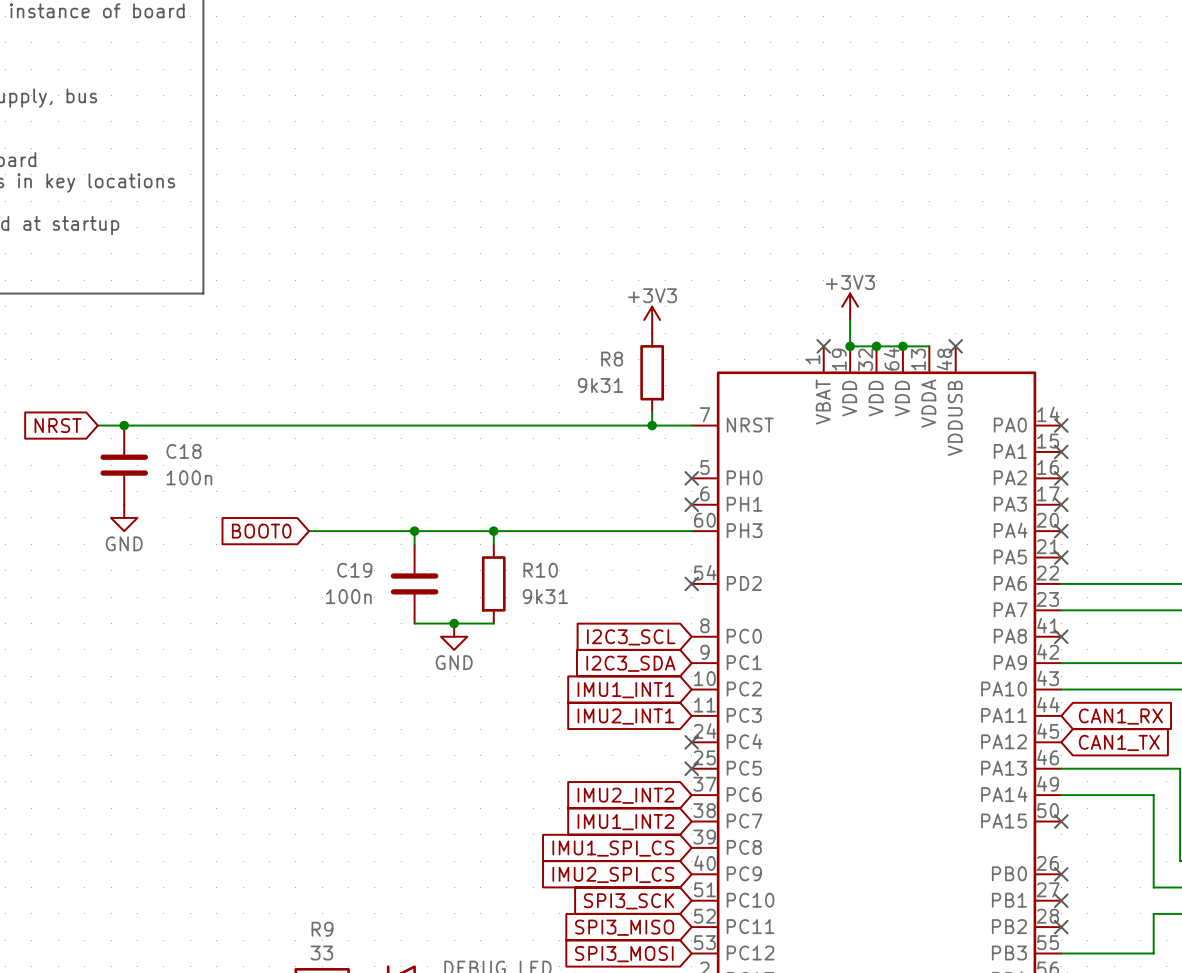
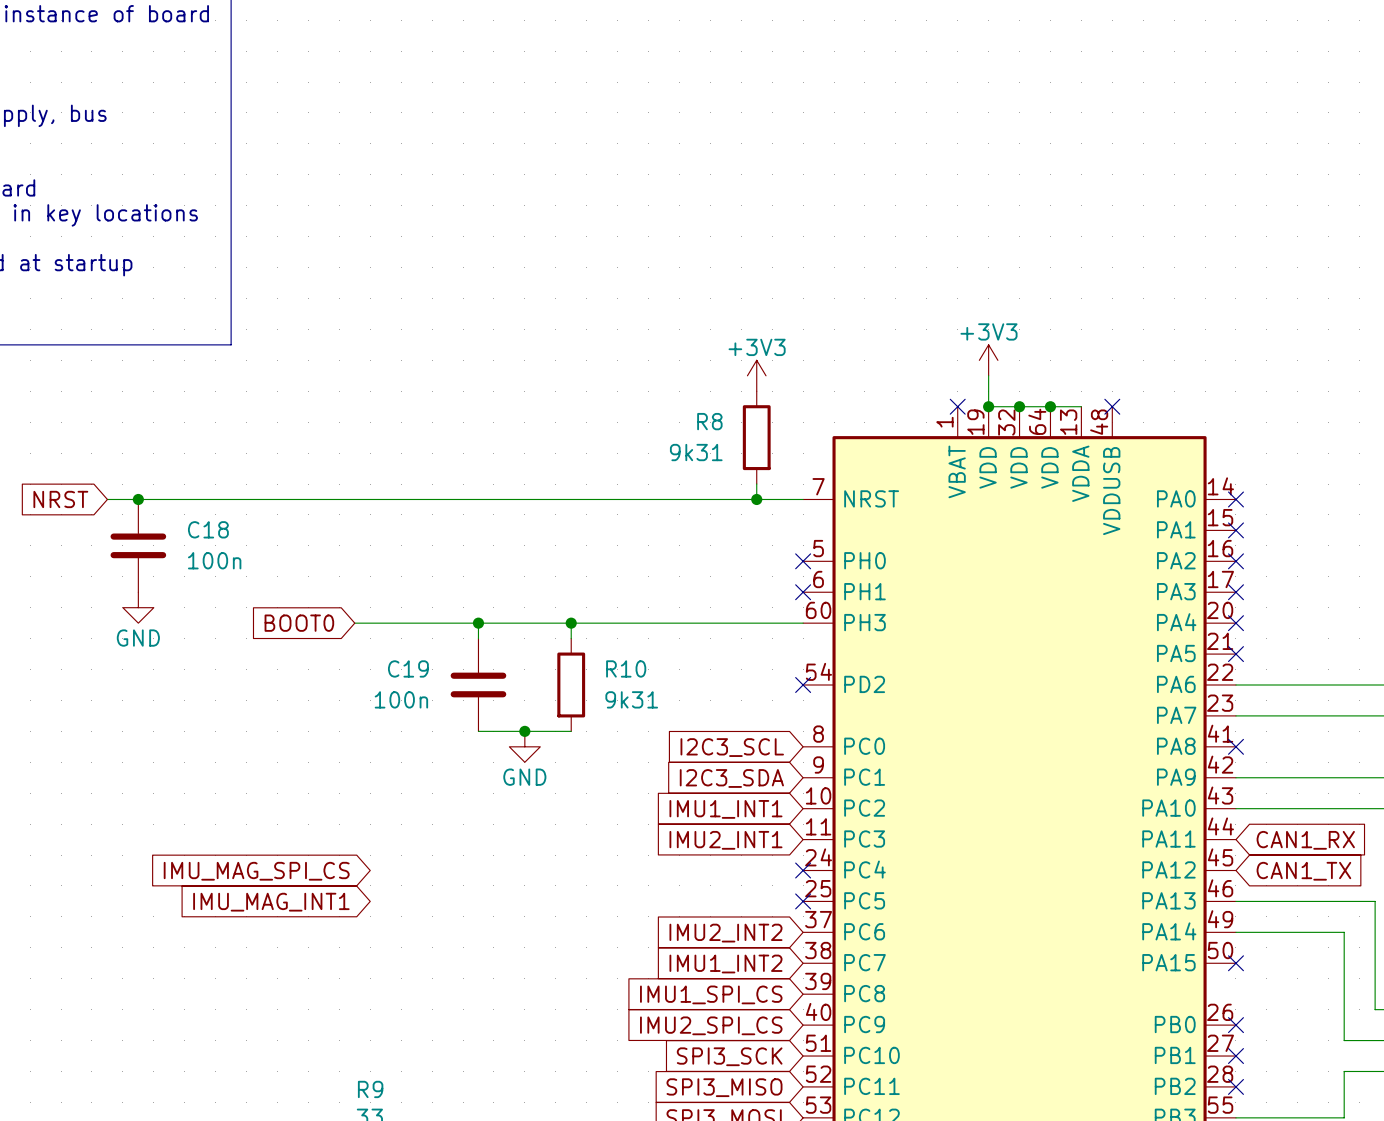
global label: none -> IMU_MAG_SPI_CS (256, 871)
global label: none -> IMU_MAG_INT1 (271, 902)

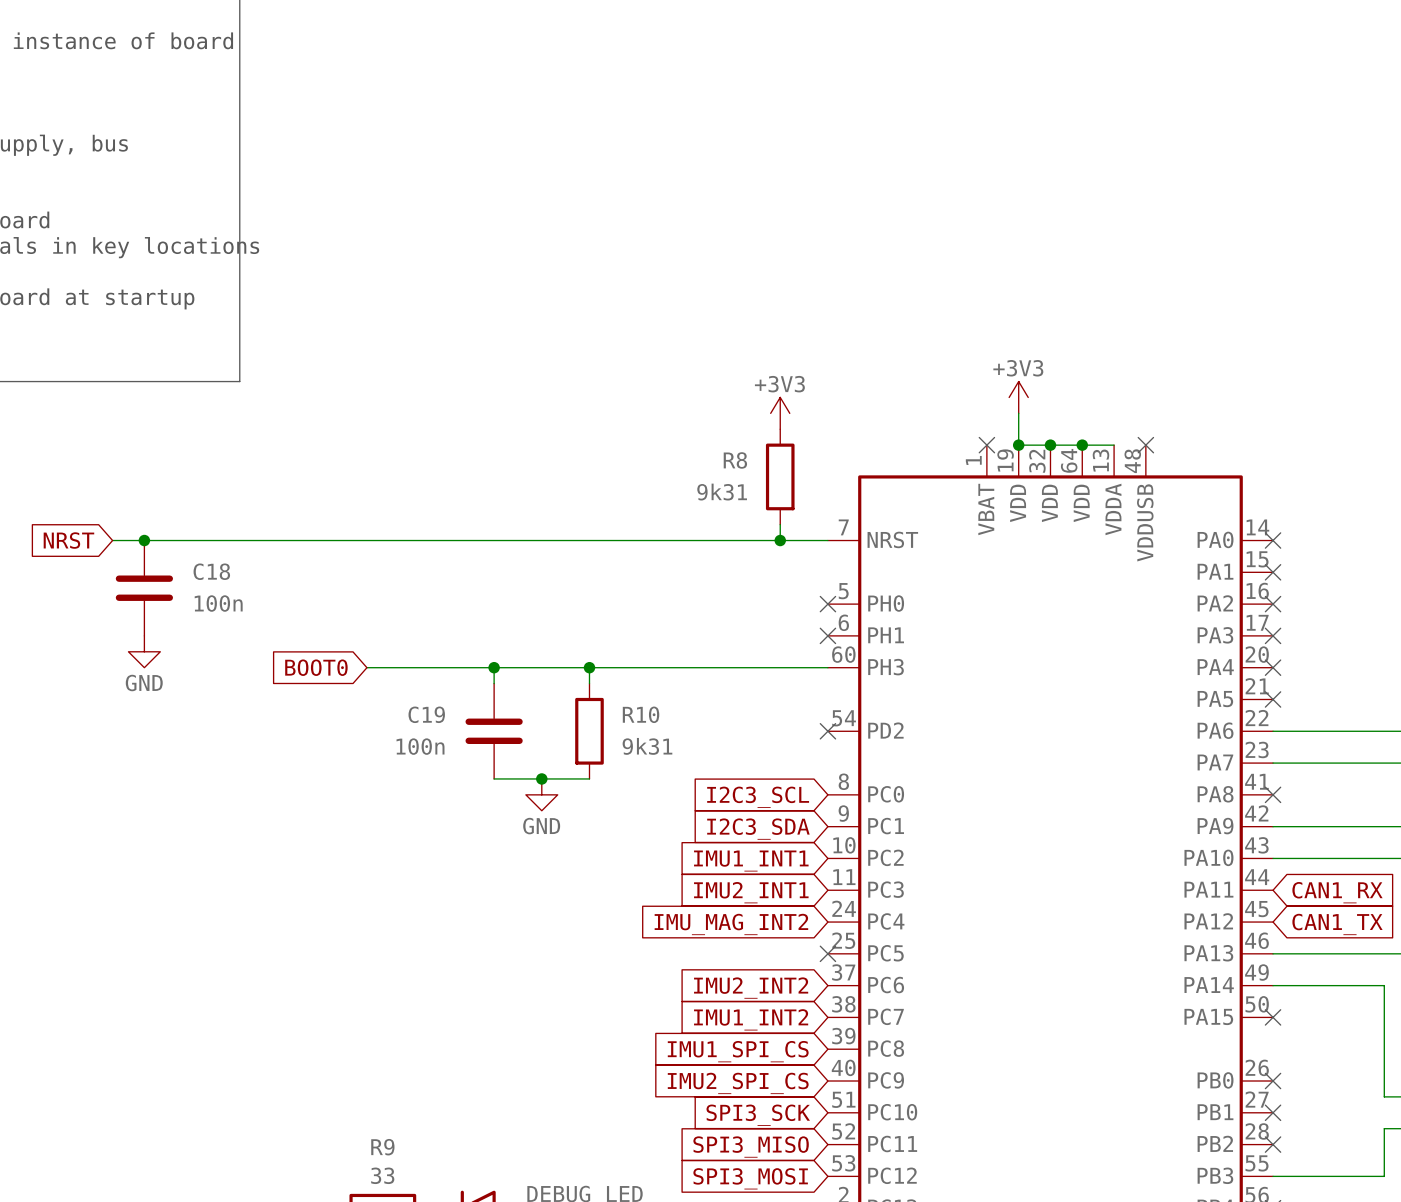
no-connect mark: (803, 870) -> none
global label: IMU_MAG_SPI_CS (256, 871) -> none
global label: none -> IMU_MAG_INT2 (731, 924)
global label: IMU_MAG_INT1 (271, 902) -> none

